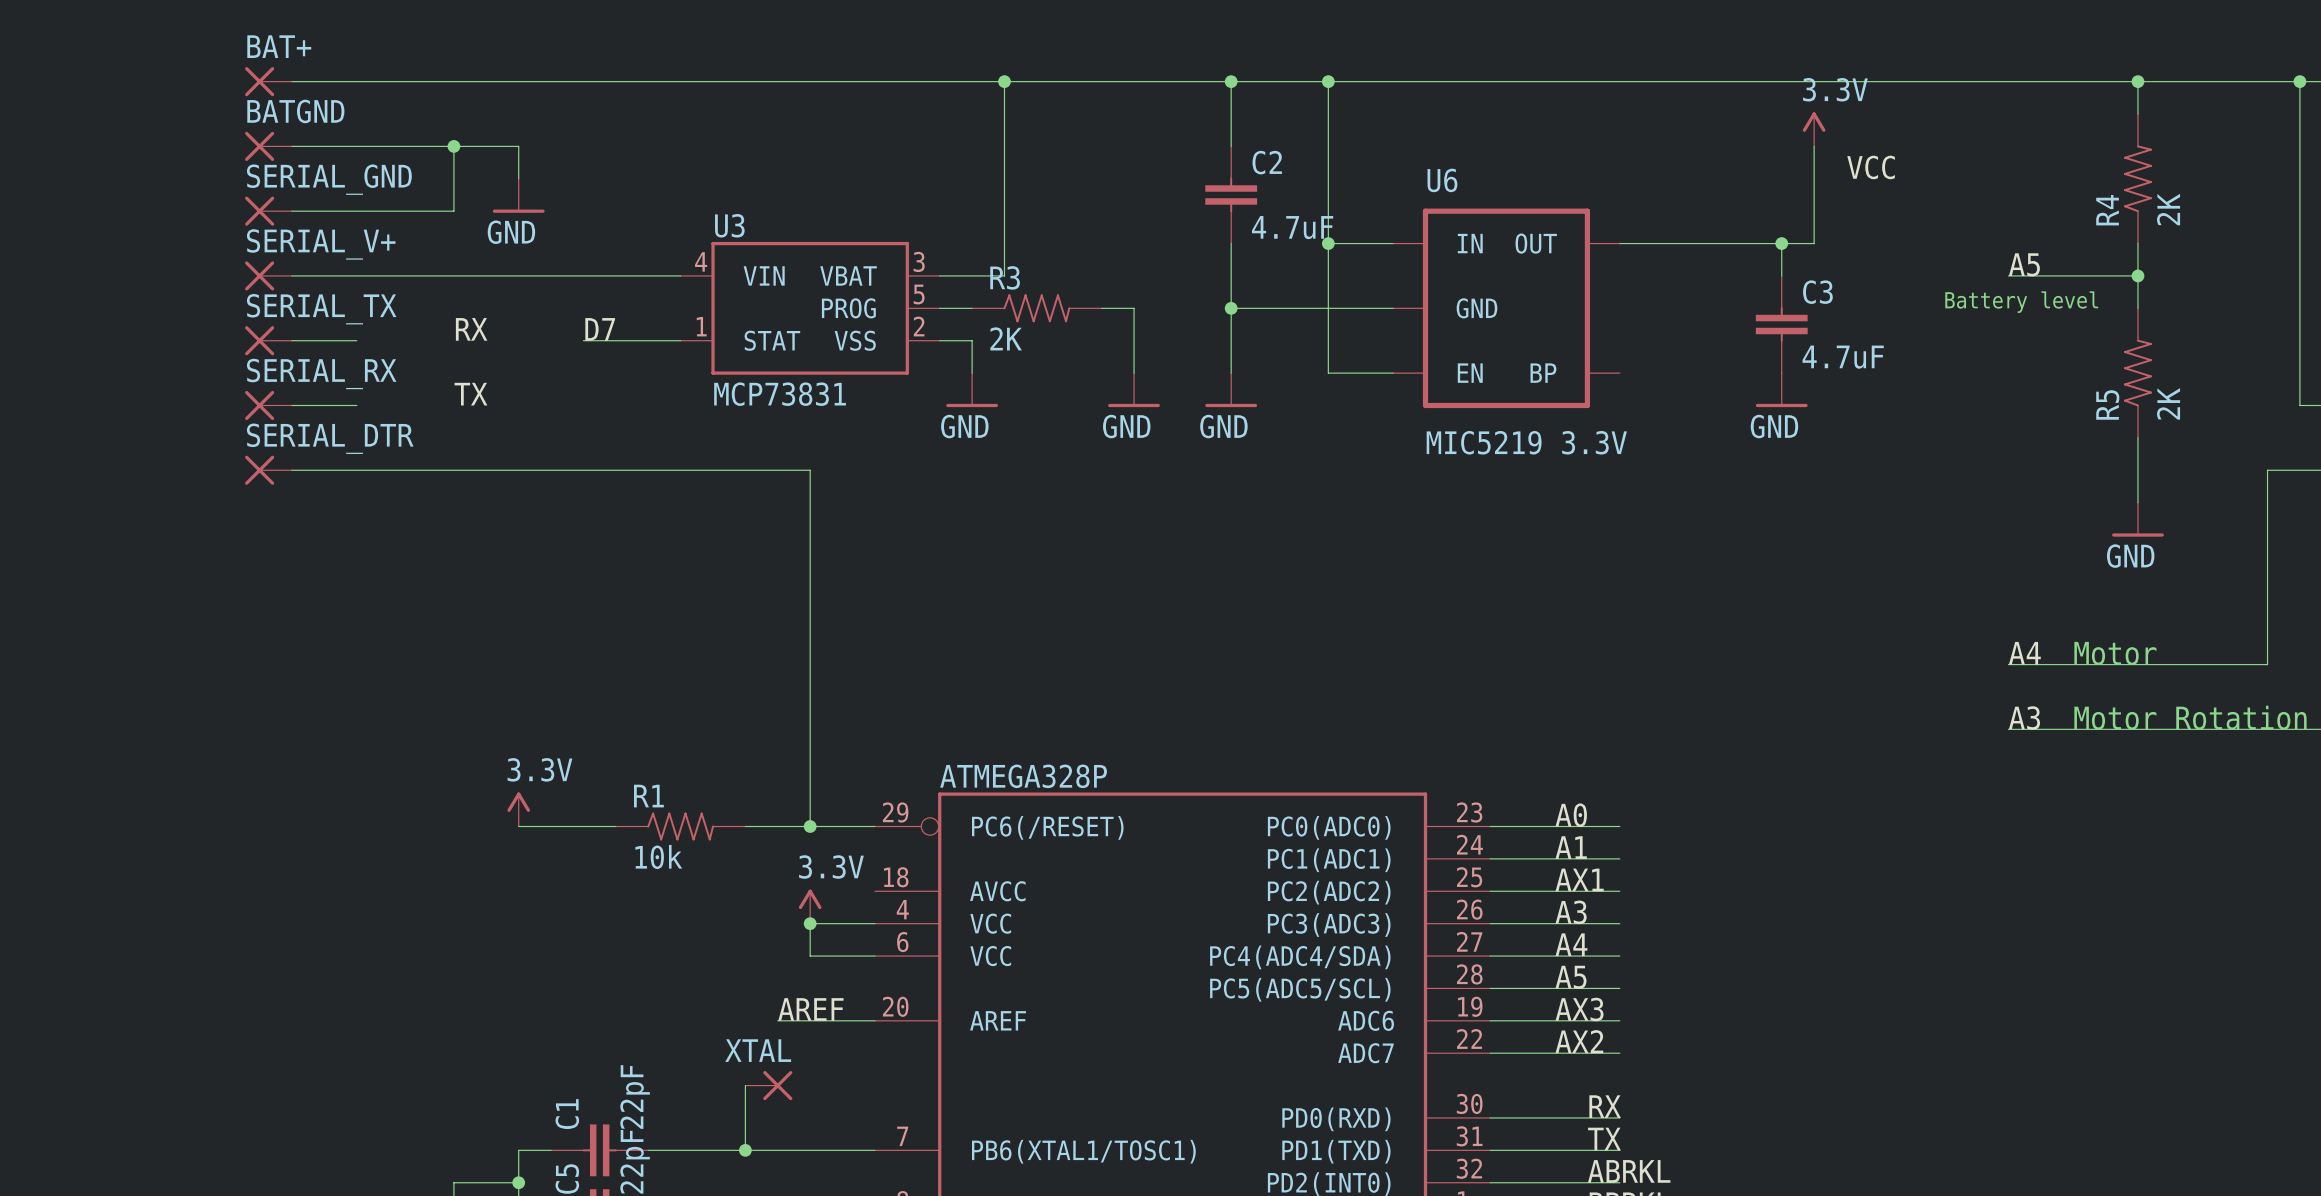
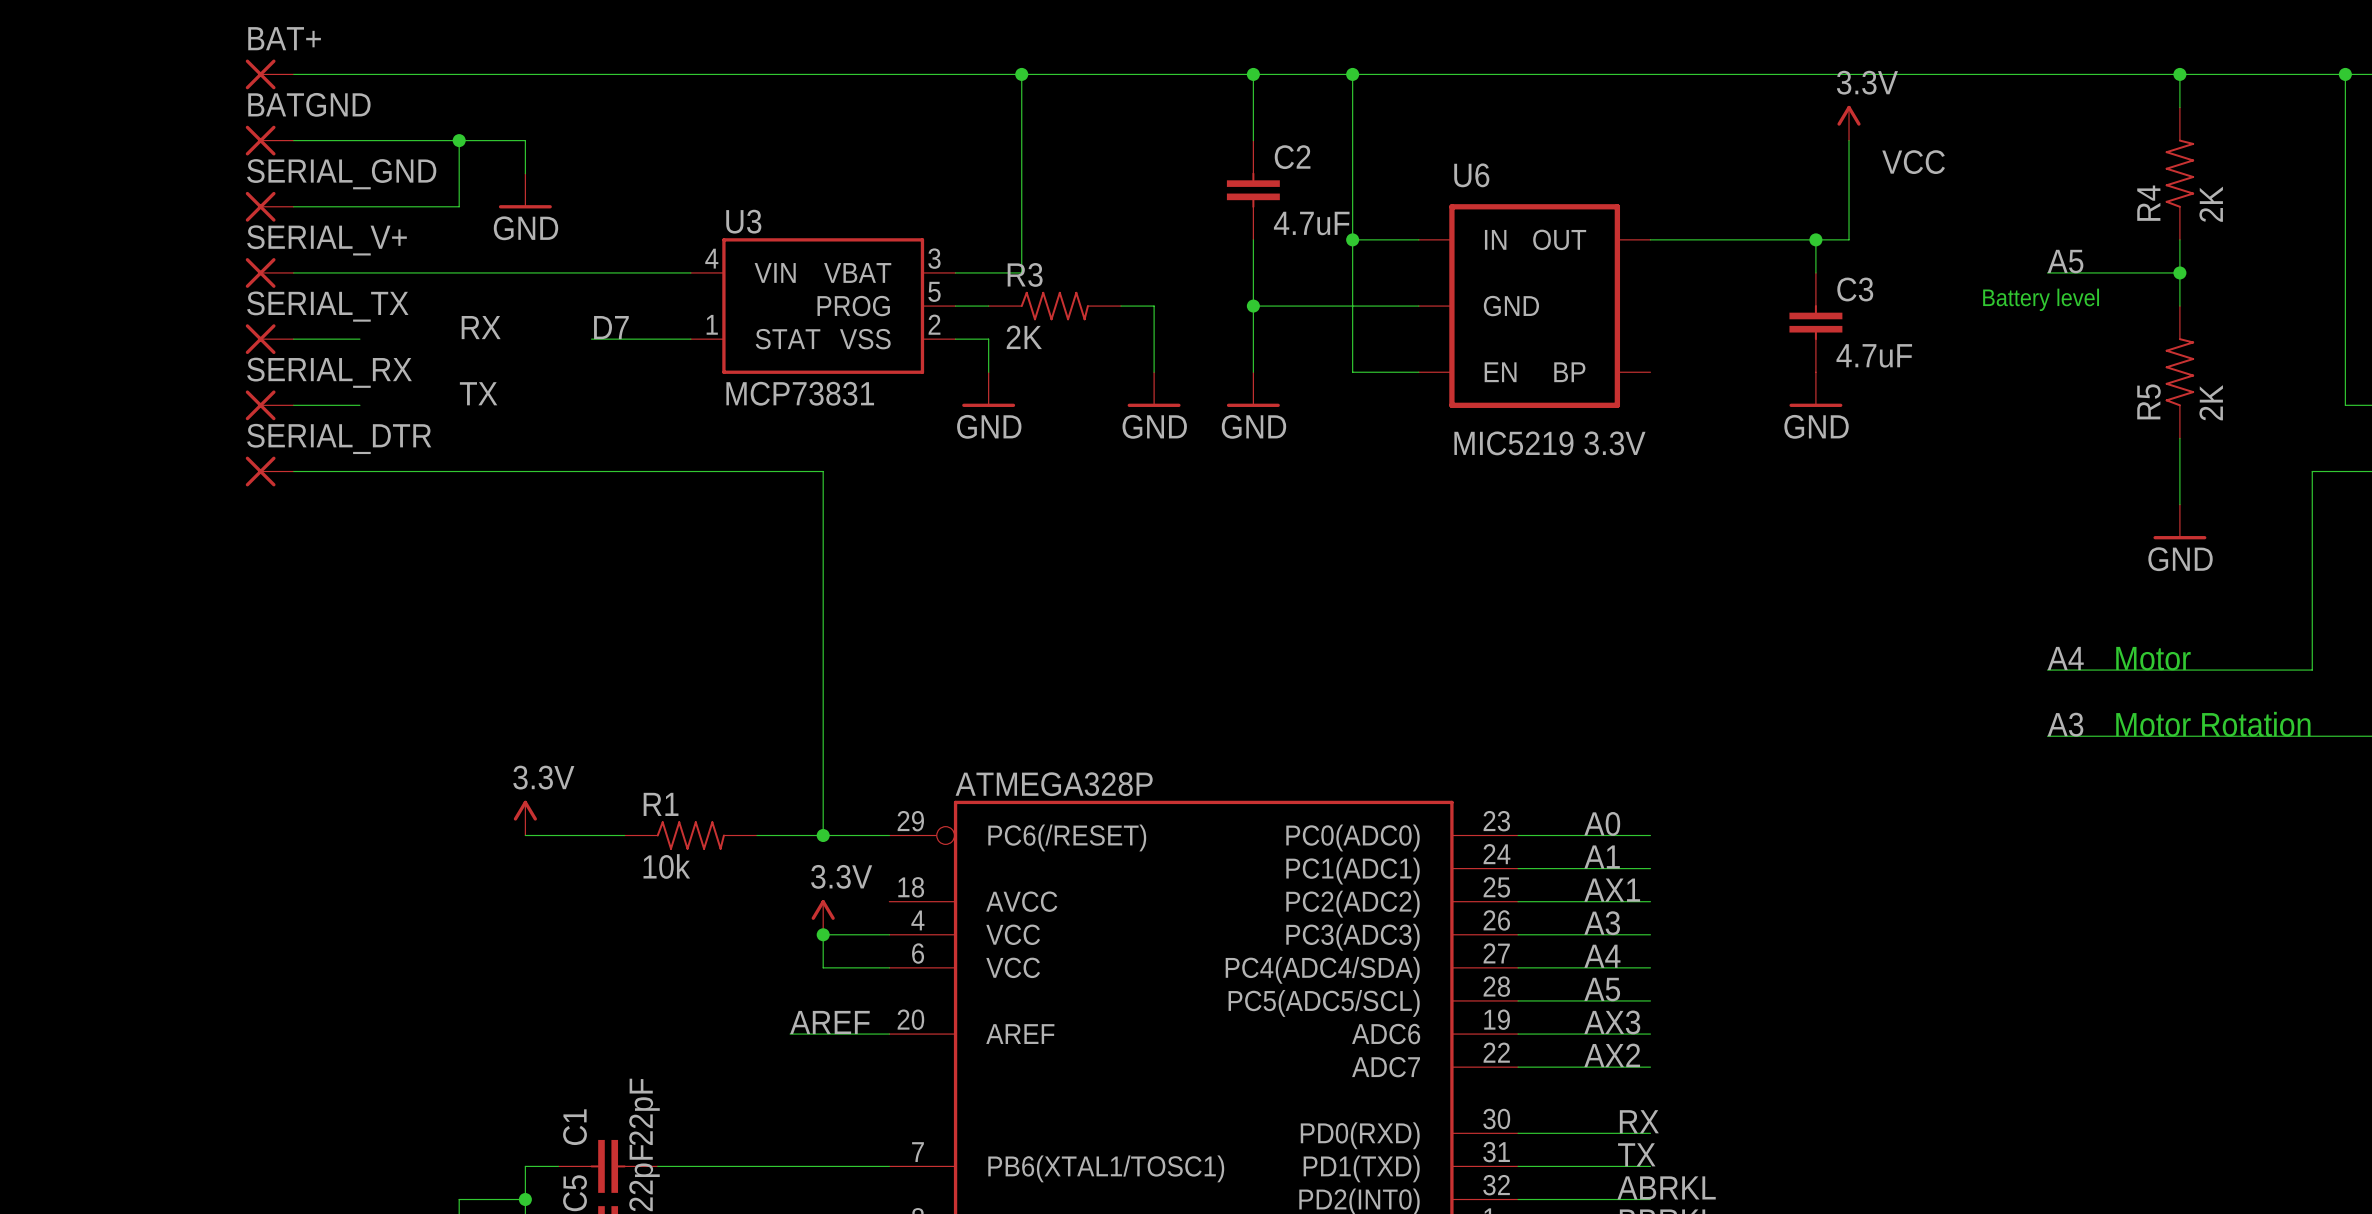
wire: (745, 1085) (745, 1150) -> none
XTAL: (768, 1085) -> none
junction: (745, 1150) -> none

